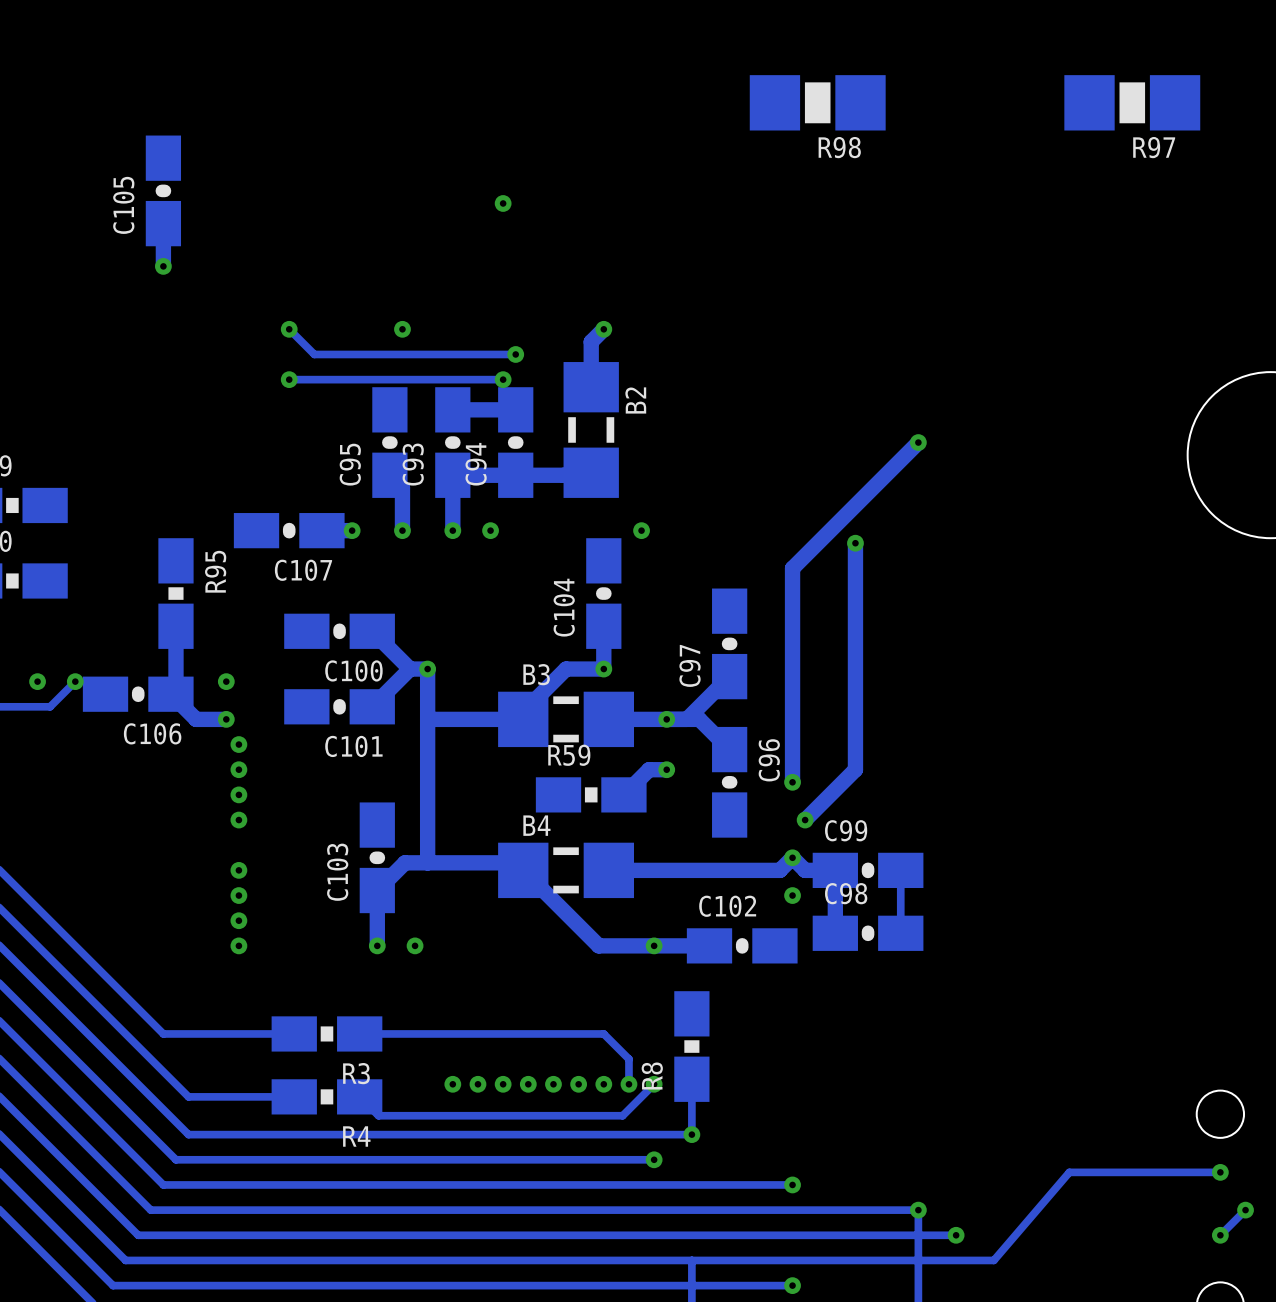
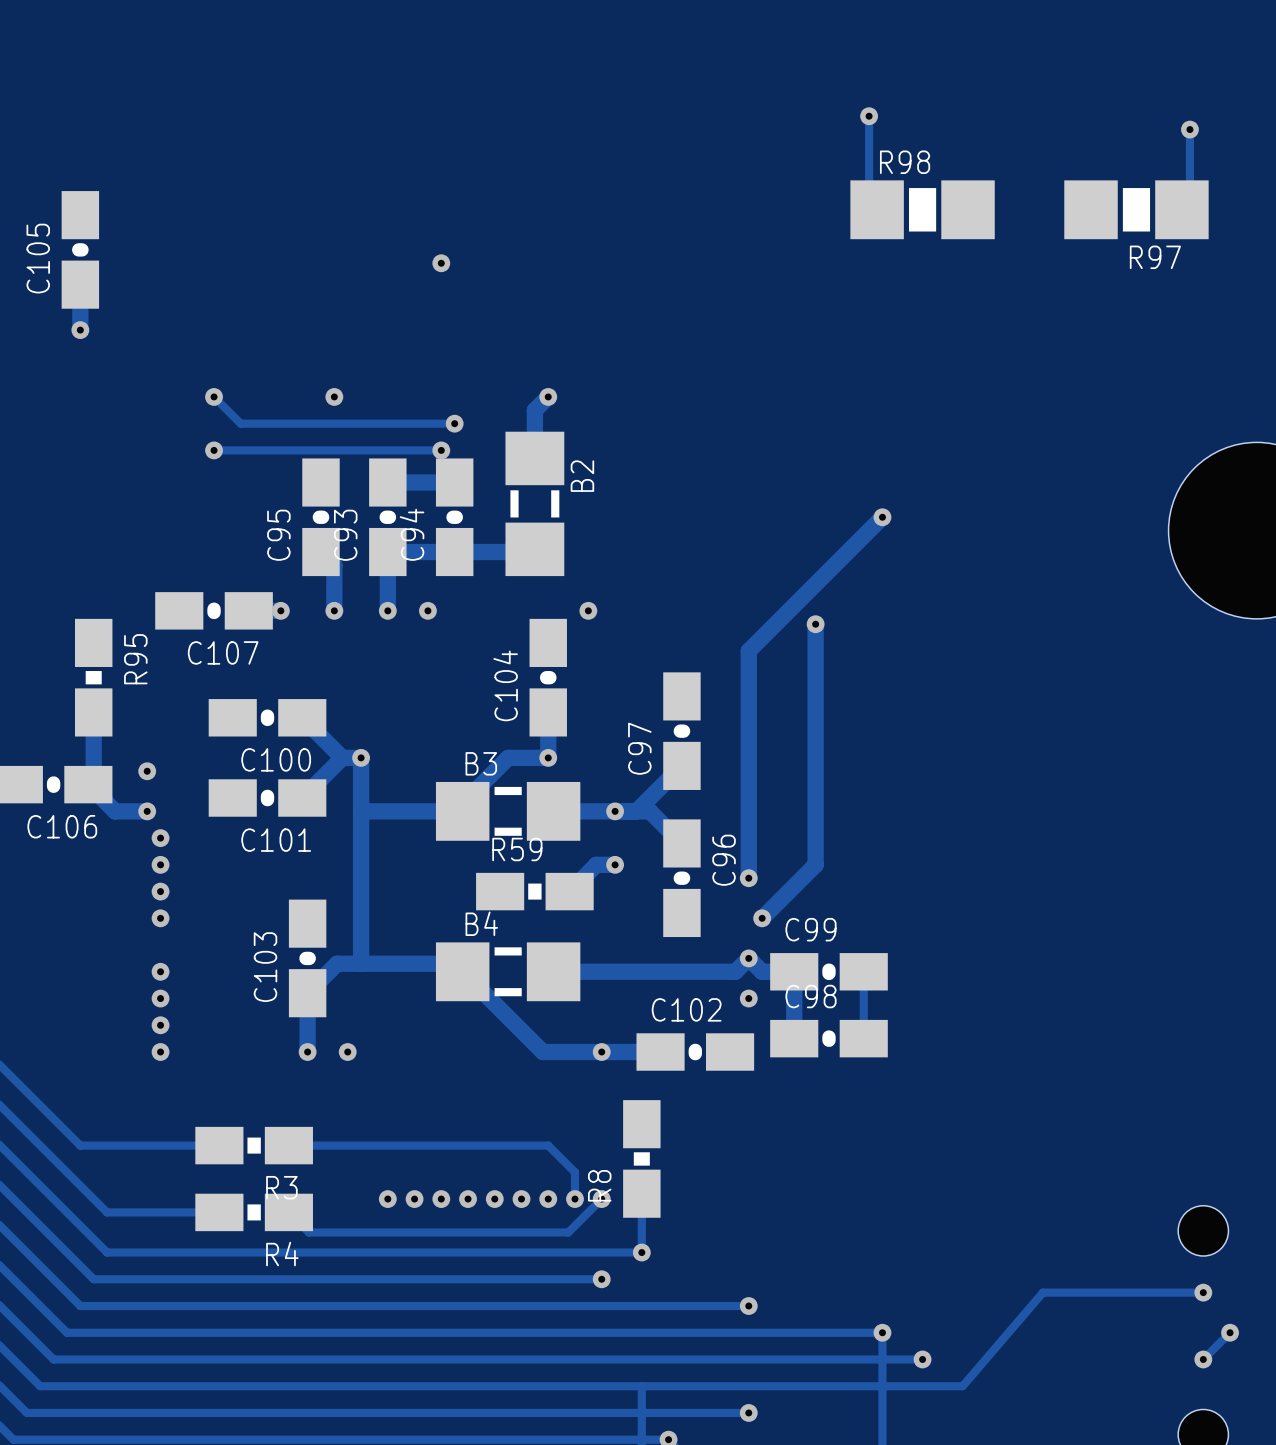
track: none -> (869, 116) (869, 201) (877, 209)
via: none -> (869, 116)
track: none -> (1189, 129) (1189, 201) (1181, 209)
via: none -> (1189, 129)
R98 position: (817, 102) -> (922, 209)
R97 position: (1132, 102) -> (1136, 209)
R98 name position: R98 (839, 147) -> R98 (905, 162)

